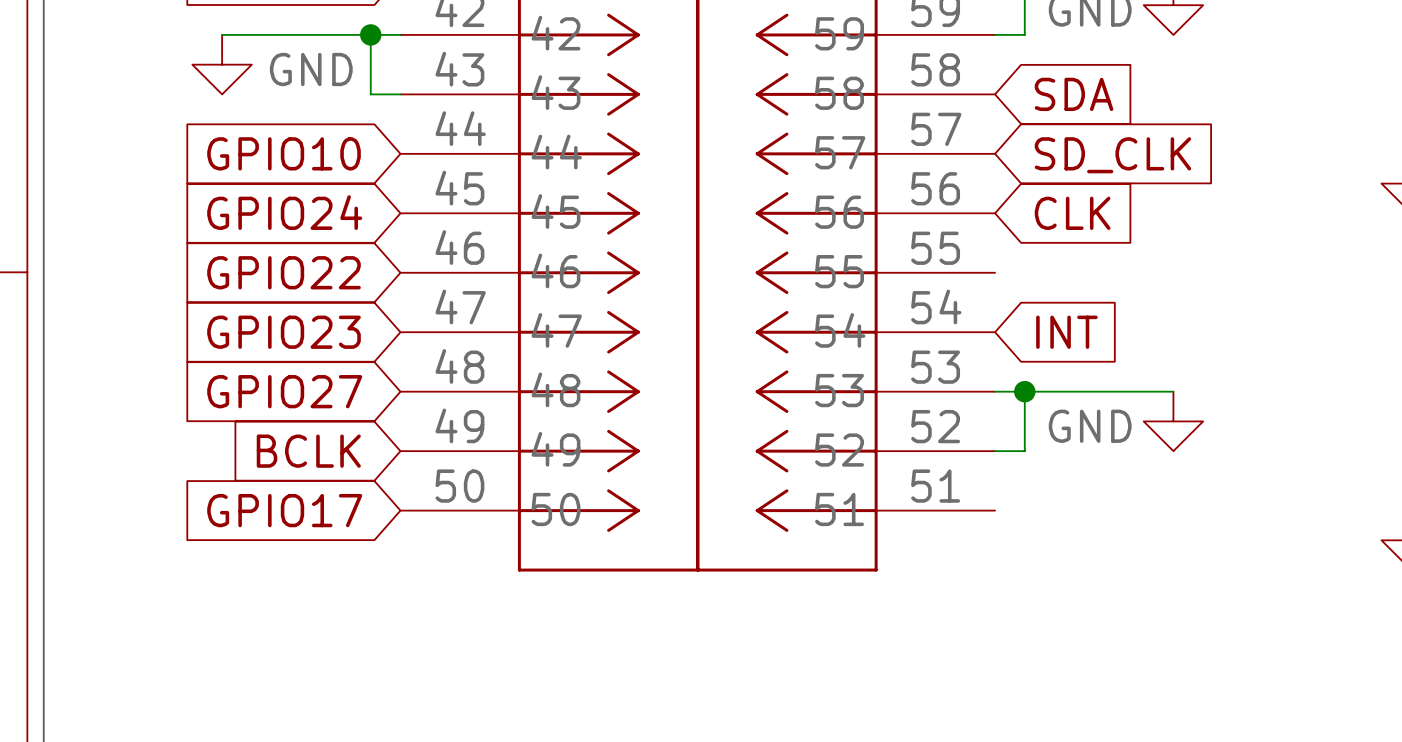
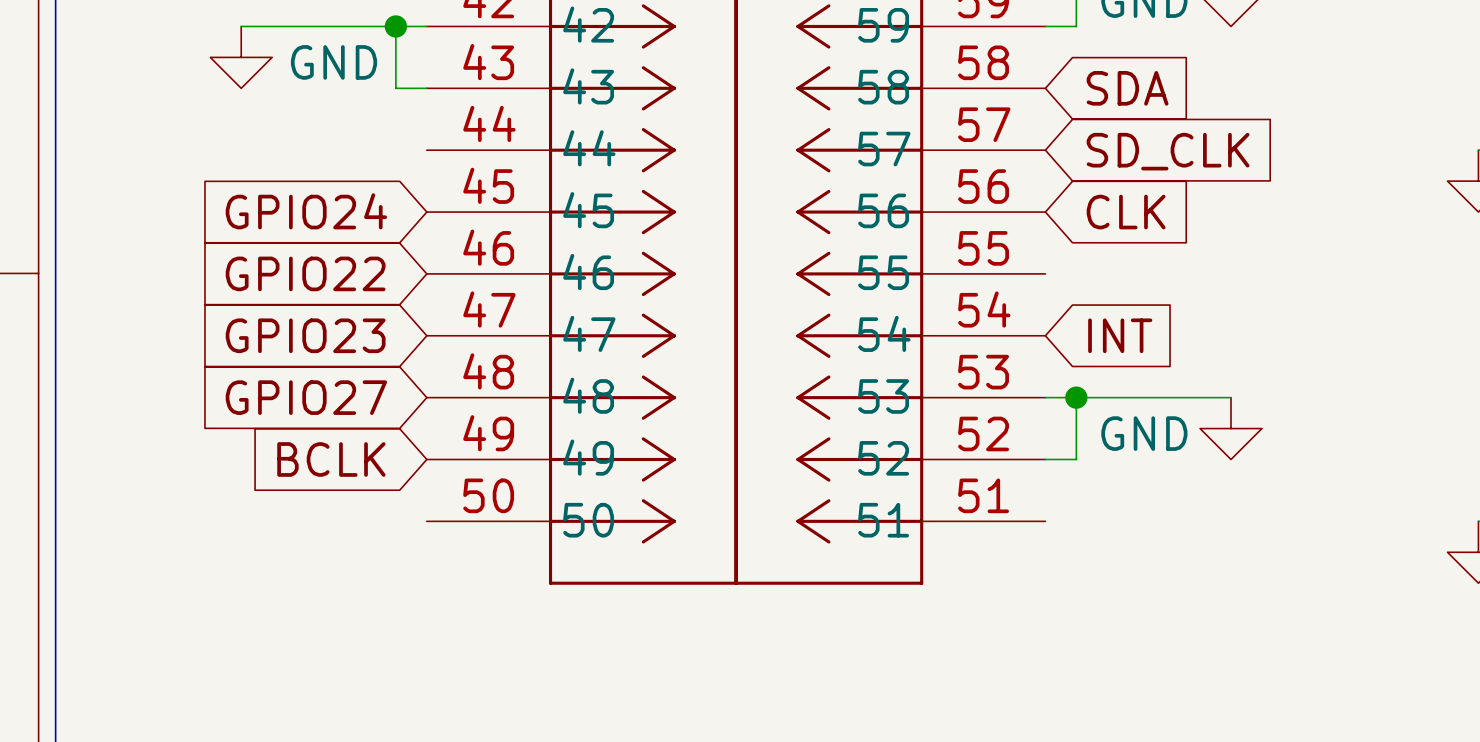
global label: GPIO10 (284, 153) -> none
global label: GPIO17 (284, 510) -> none

